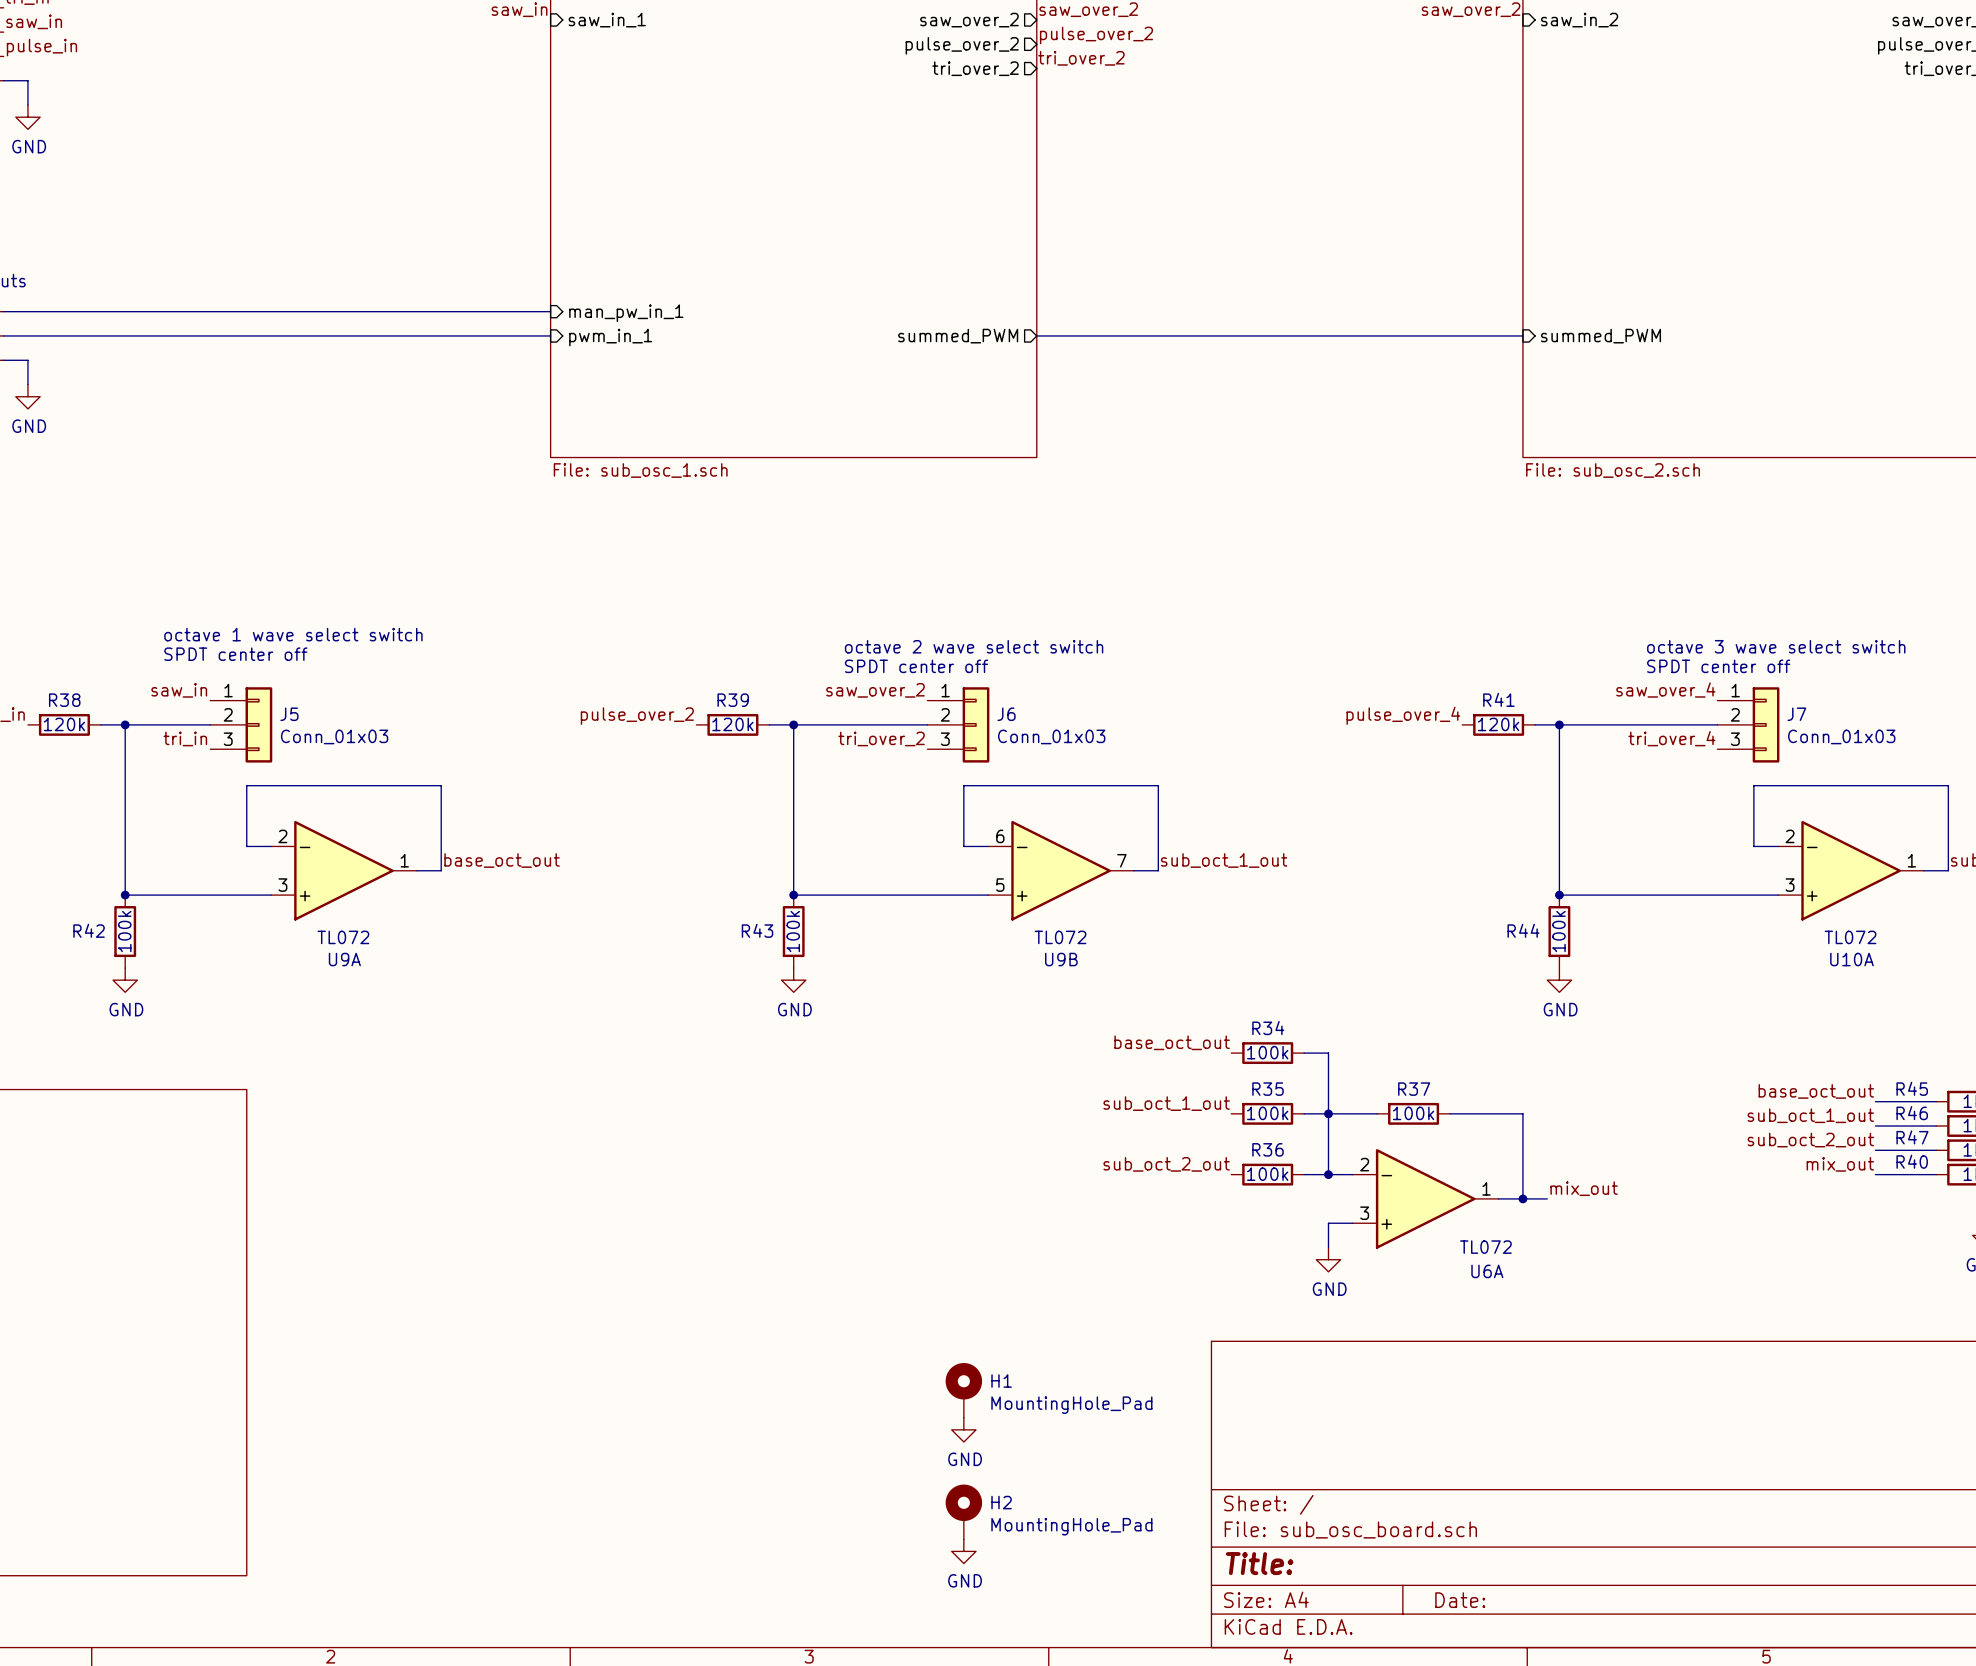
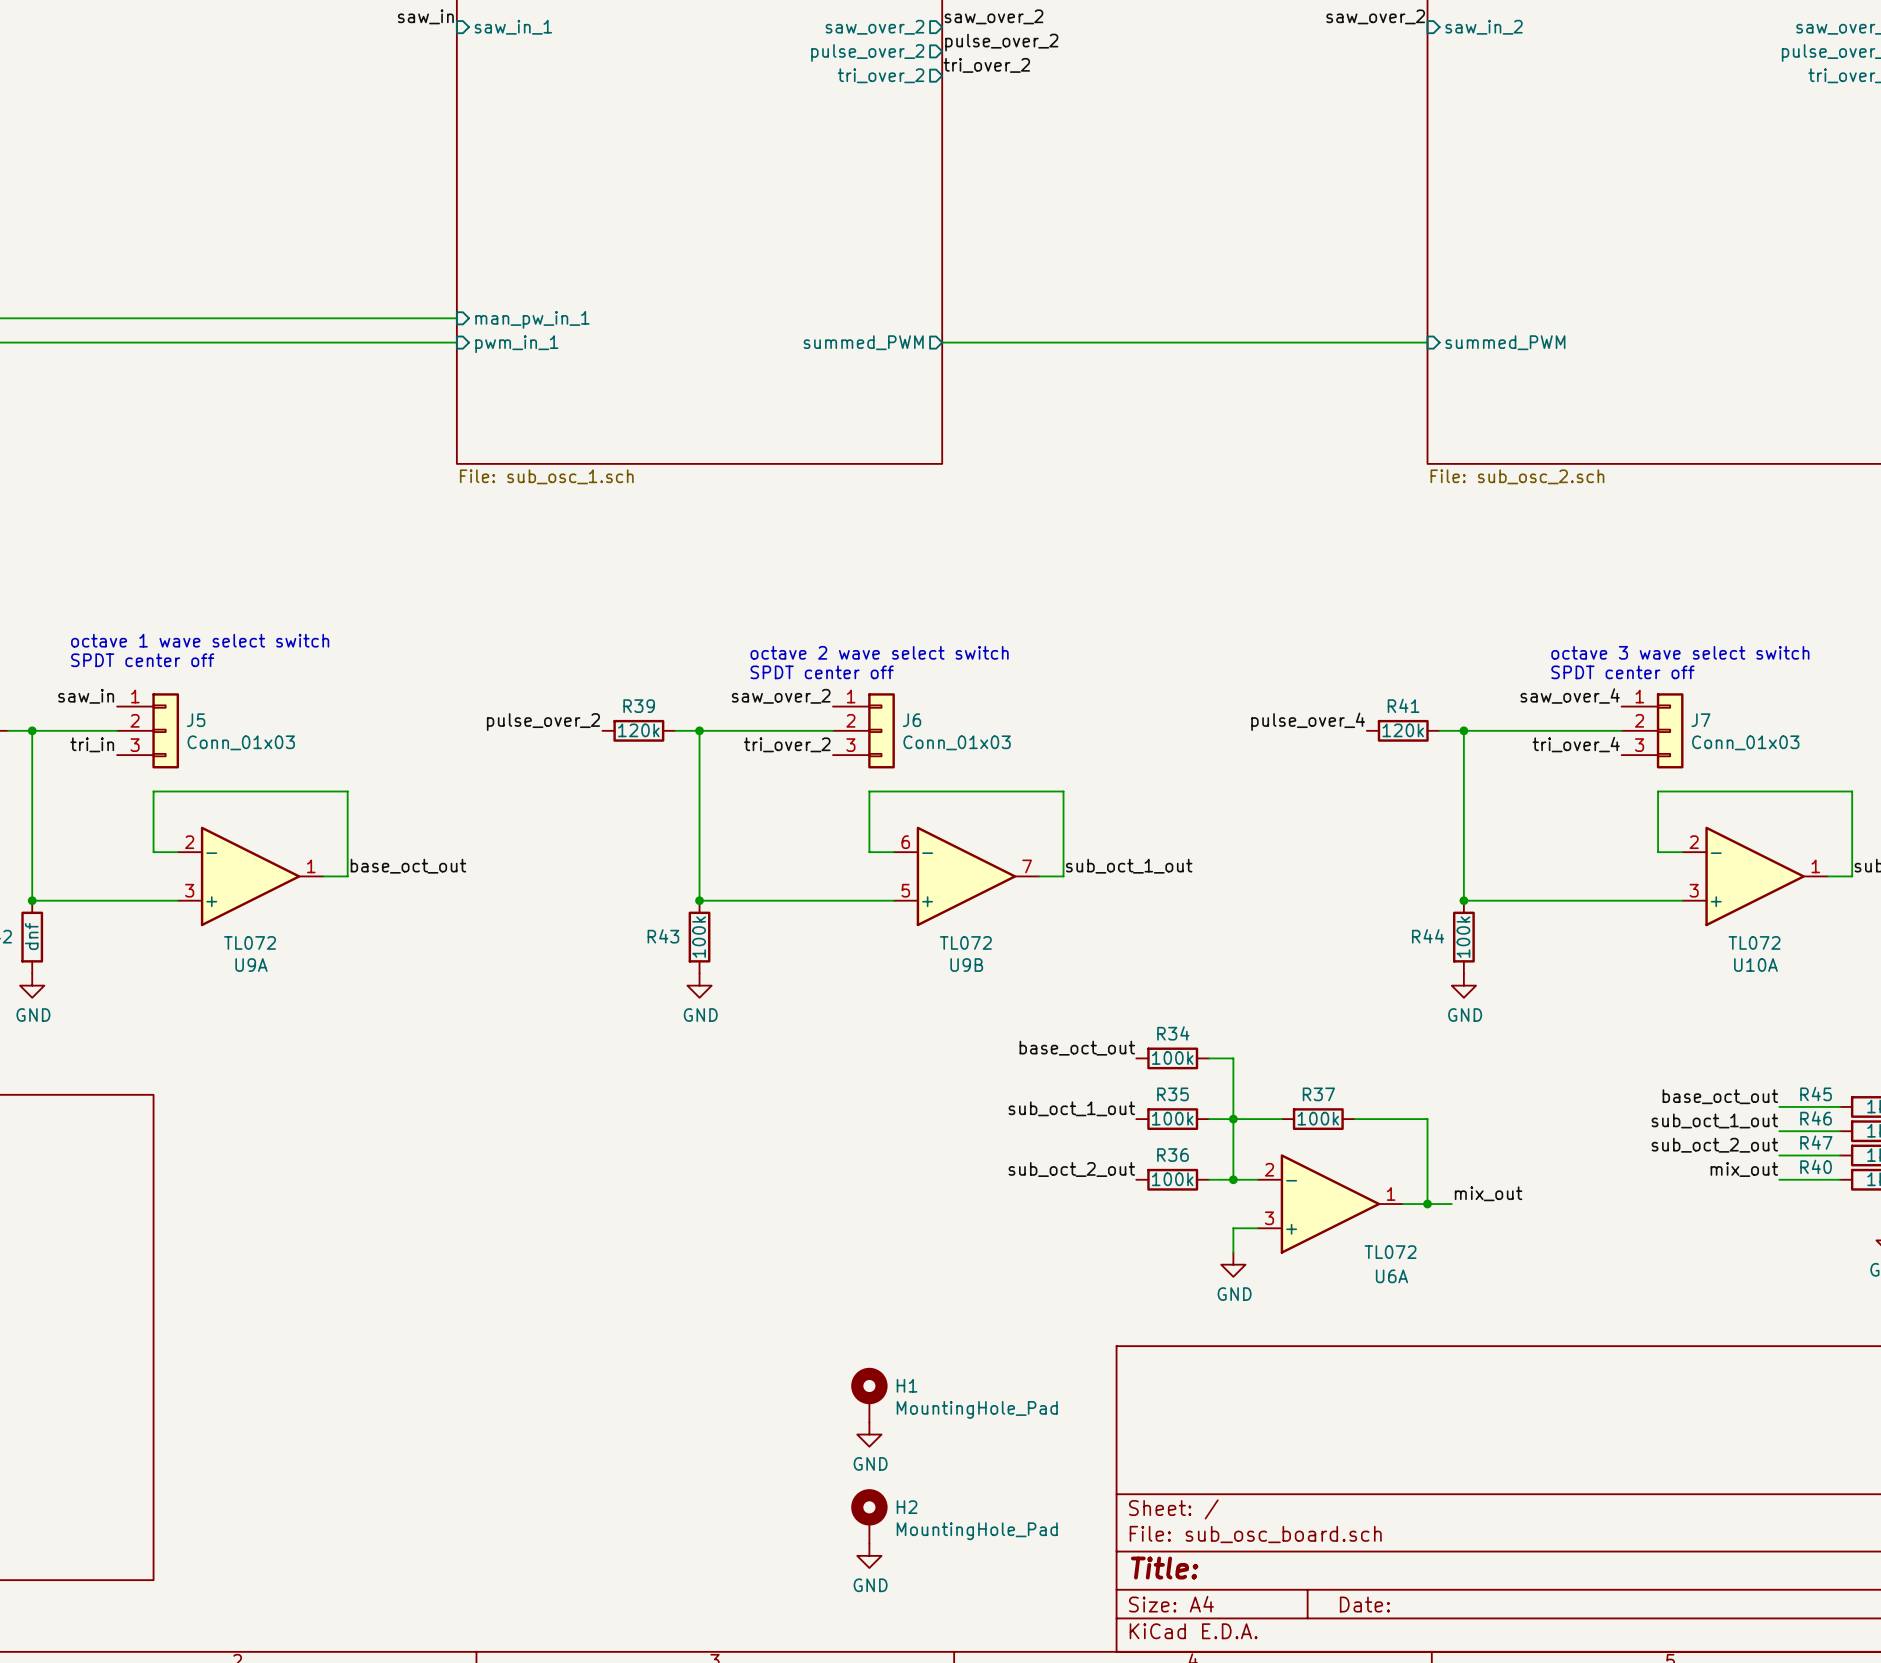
R42 value: 100k (124, 931) -> dnf (31, 936)

